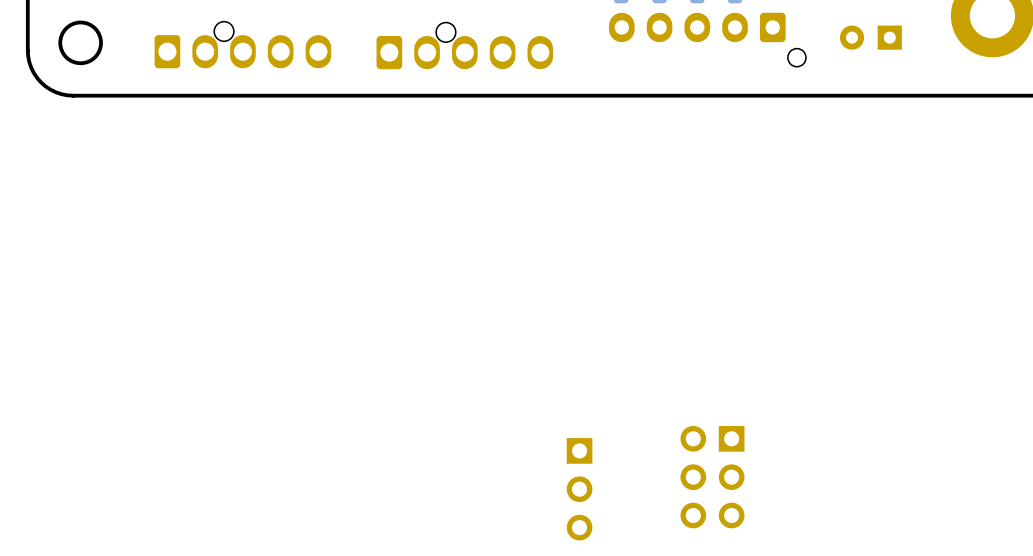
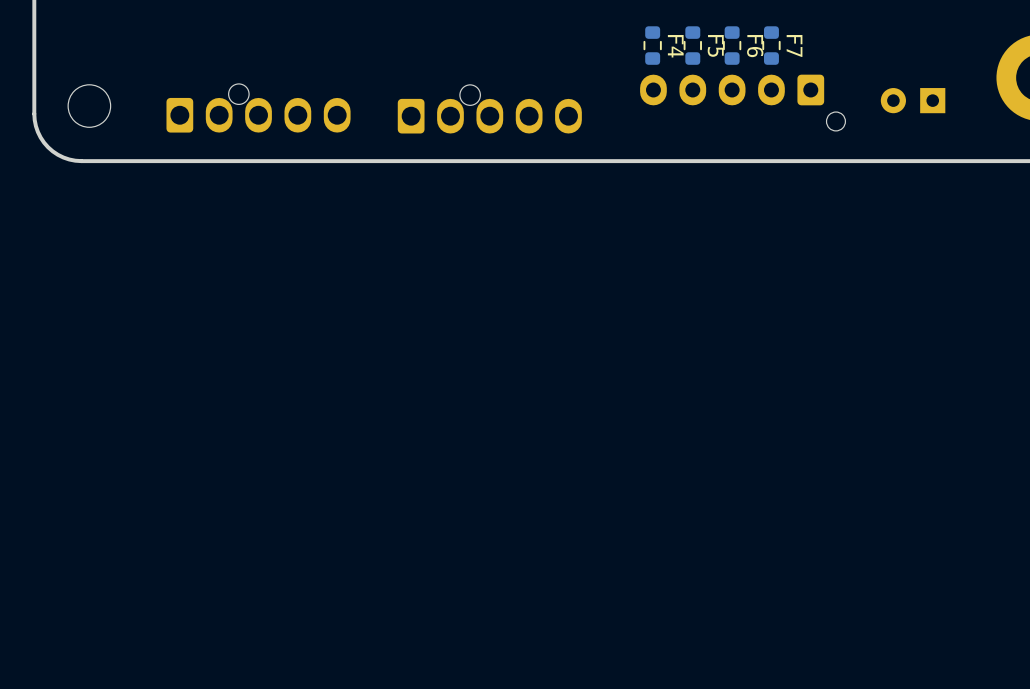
round board edge: [58, 20, 103, 66] -> none
part: (712, 477) -> none
part: (579, 489) -> none

